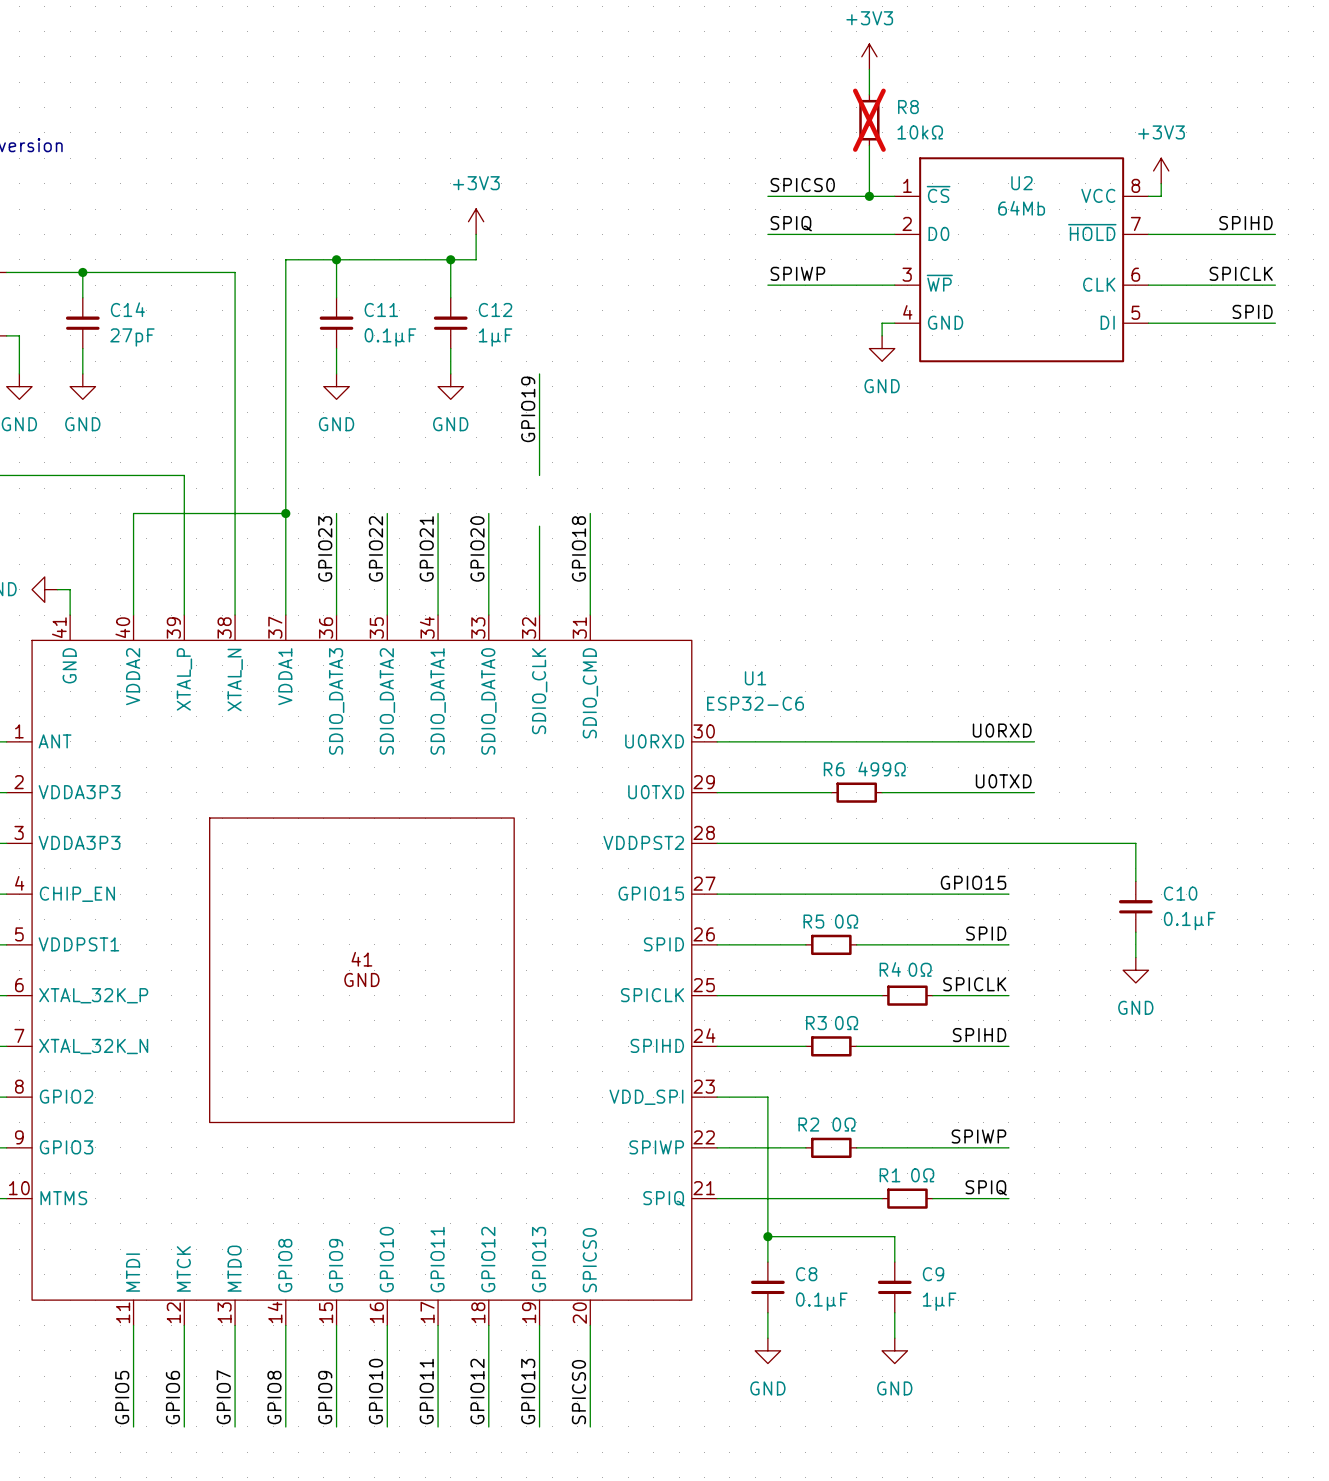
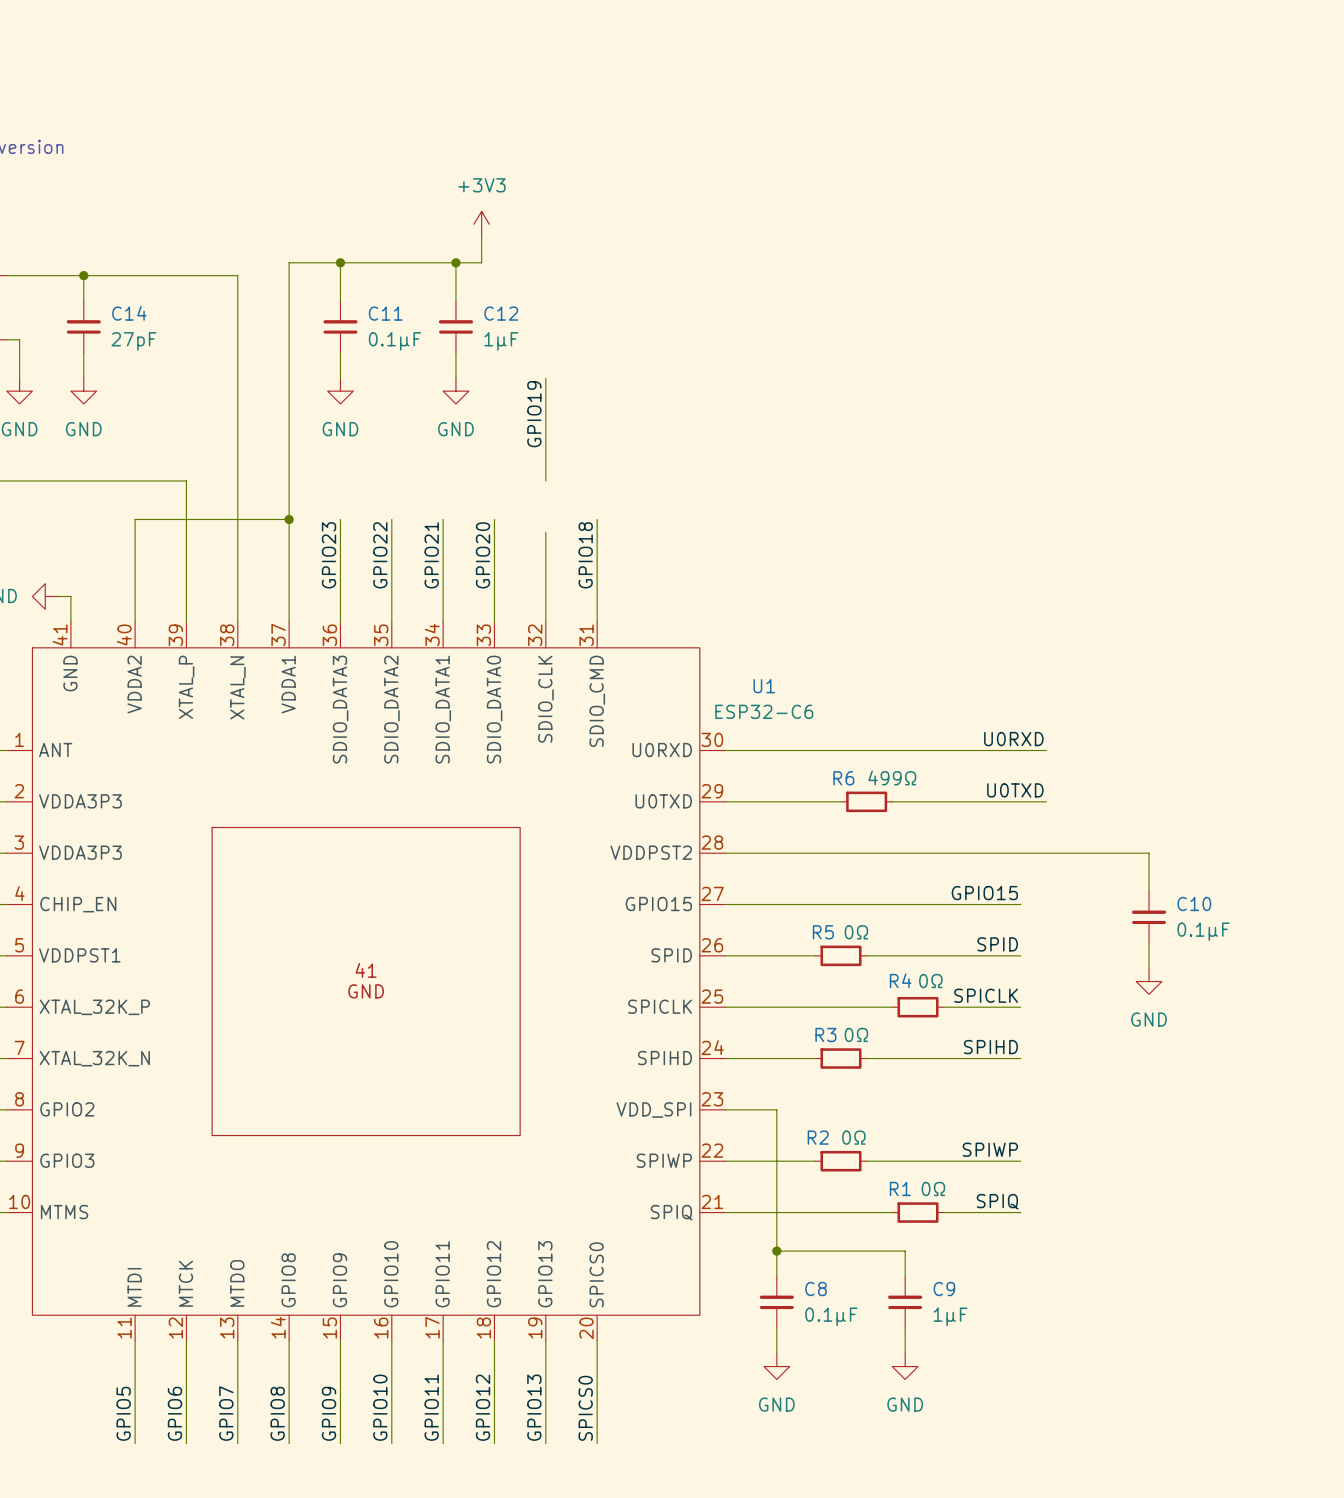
power symbol: +3V3 (869, 56) -> none
wire: (869, 69) (869, 94) -> none
R8: (869, 120) -> none
wire: (869, 145) (869, 196) -> none
power symbol: +3V3 (1161, 170) -> none
wire: (1161, 183) (1161, 196) (1148, 196) -> none
label: SPICS0 (802, 185) -> none
wire: (767, 196) (894, 196) -> none
junction: (869, 196) -> none
label: SPIQ (791, 223) -> none
label: SPIHD (1245, 223) -> none
wire: (767, 234) (894, 234) -> none
wire: (1148, 234) (1275, 234) -> none
U2: (1021, 259) -> none
label: SPIWP (797, 273) -> none
label: SPICLK (1241, 273) -> none
wire: (767, 285) (894, 285) -> none
wire: (1148, 285) (1275, 285) -> none
label: SPID (1252, 311) -> none
wire: (894, 323) (882, 323) (882, 335) -> none
wire: (1148, 323) (1275, 323) -> none
power symbol: GND (882, 348) -> none

